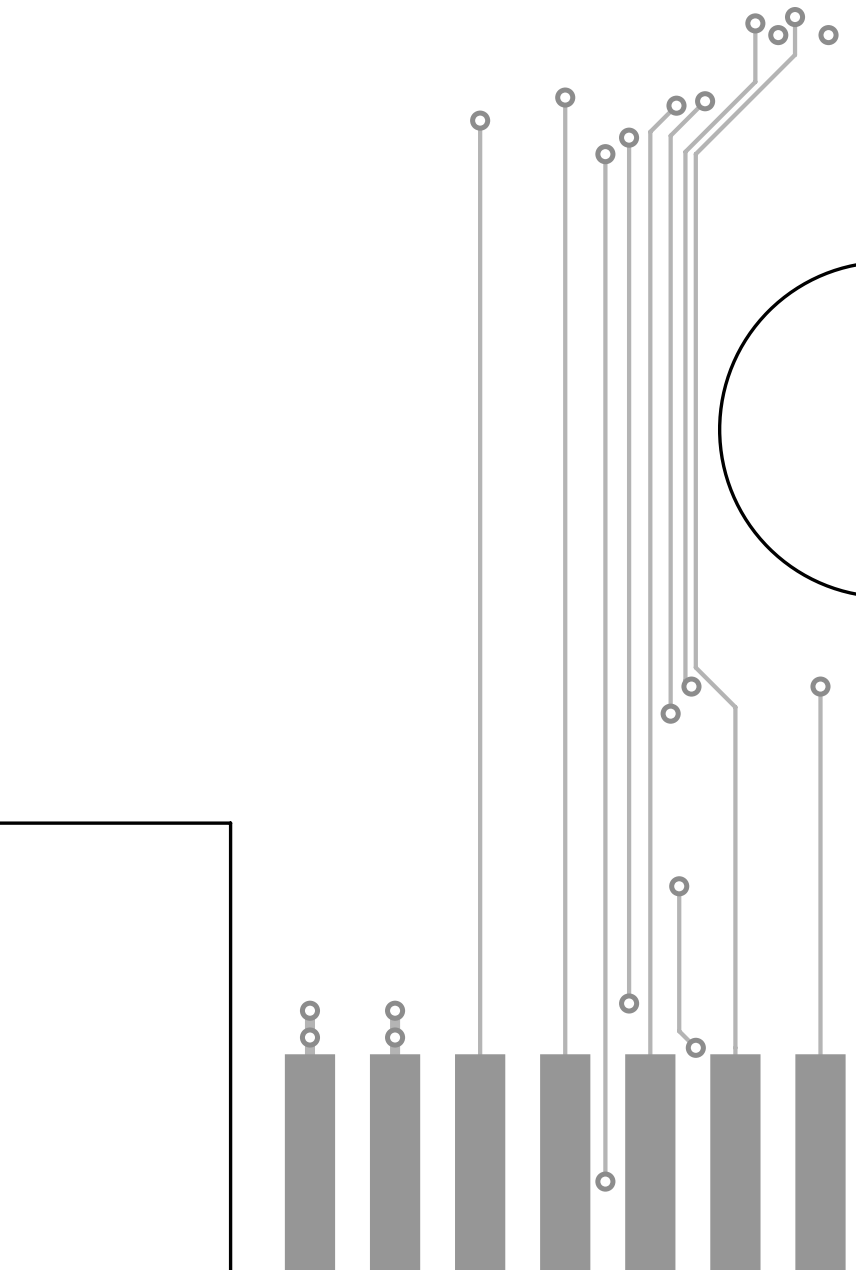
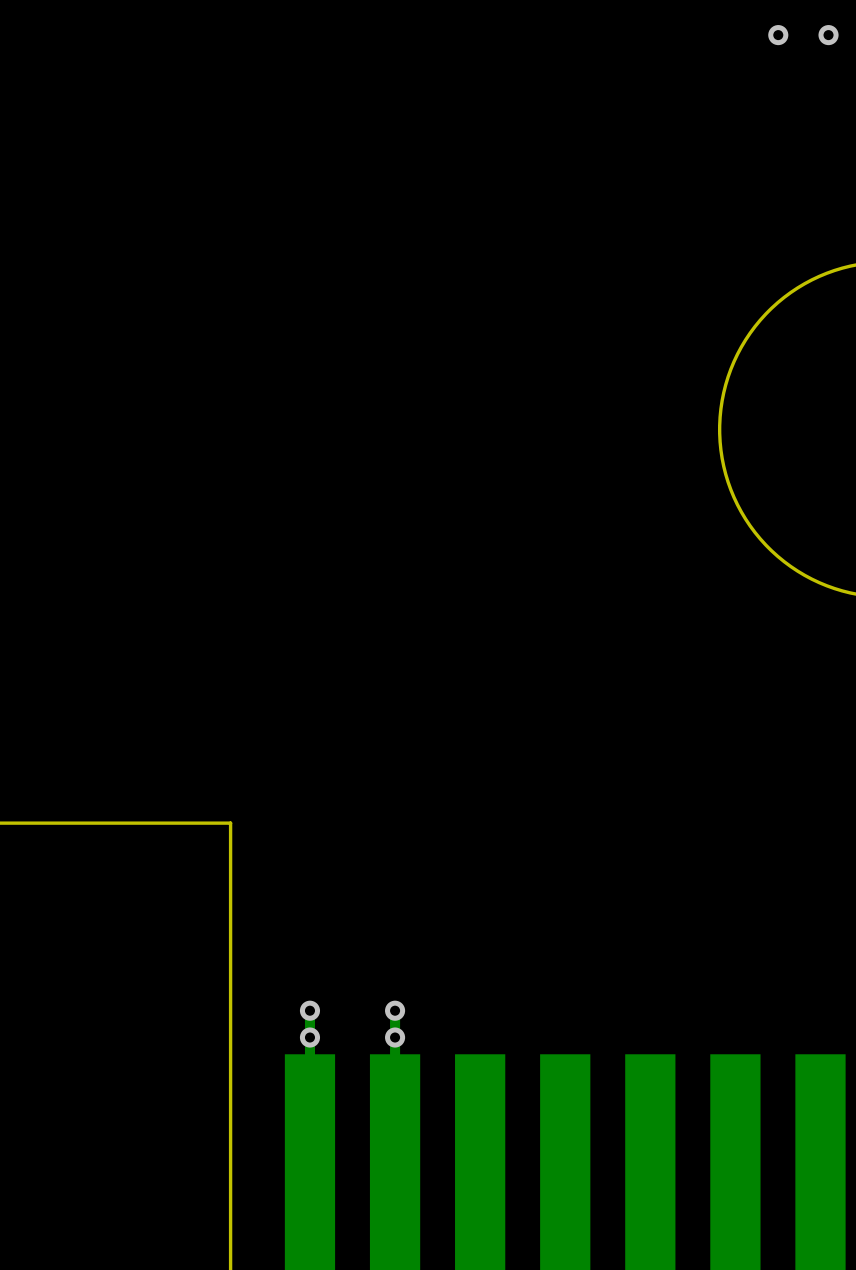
track: (795, 17) (795, 54) (695, 154) (695, 667) (735, 707) (735, 1221) -> none
via: (795, 17) -> none
track: (755, 23) (755, 81) (685, 151) (685, 680) (691, 686) -> none
via: (755, 23) -> none
track: (565, 97) (565, 1221) -> none
via: (565, 97) -> none
track: (705, 101) (670, 135) (670, 713) -> none
via: (705, 101) -> none
track: (676, 105) (650, 131) (650, 1221) -> none
via: (676, 105) -> none
track: (480, 120) (480, 1221) -> none
via: (480, 120) -> none
track: (629, 137) (629, 1003) -> none
via: (629, 137) -> none
track: (605, 154) (605, 1181) -> none
via: (605, 154) -> none
via: (691, 686) -> none
track: (820, 686) (820, 1221) -> none
via: (820, 686) -> none
via: (670, 713) -> none
track: (679, 886) (679, 1031) (695, 1047) -> none
via: (679, 886) -> none
via: (629, 1003) -> none
via: (695, 1047) -> none
via: (605, 1181) -> none

